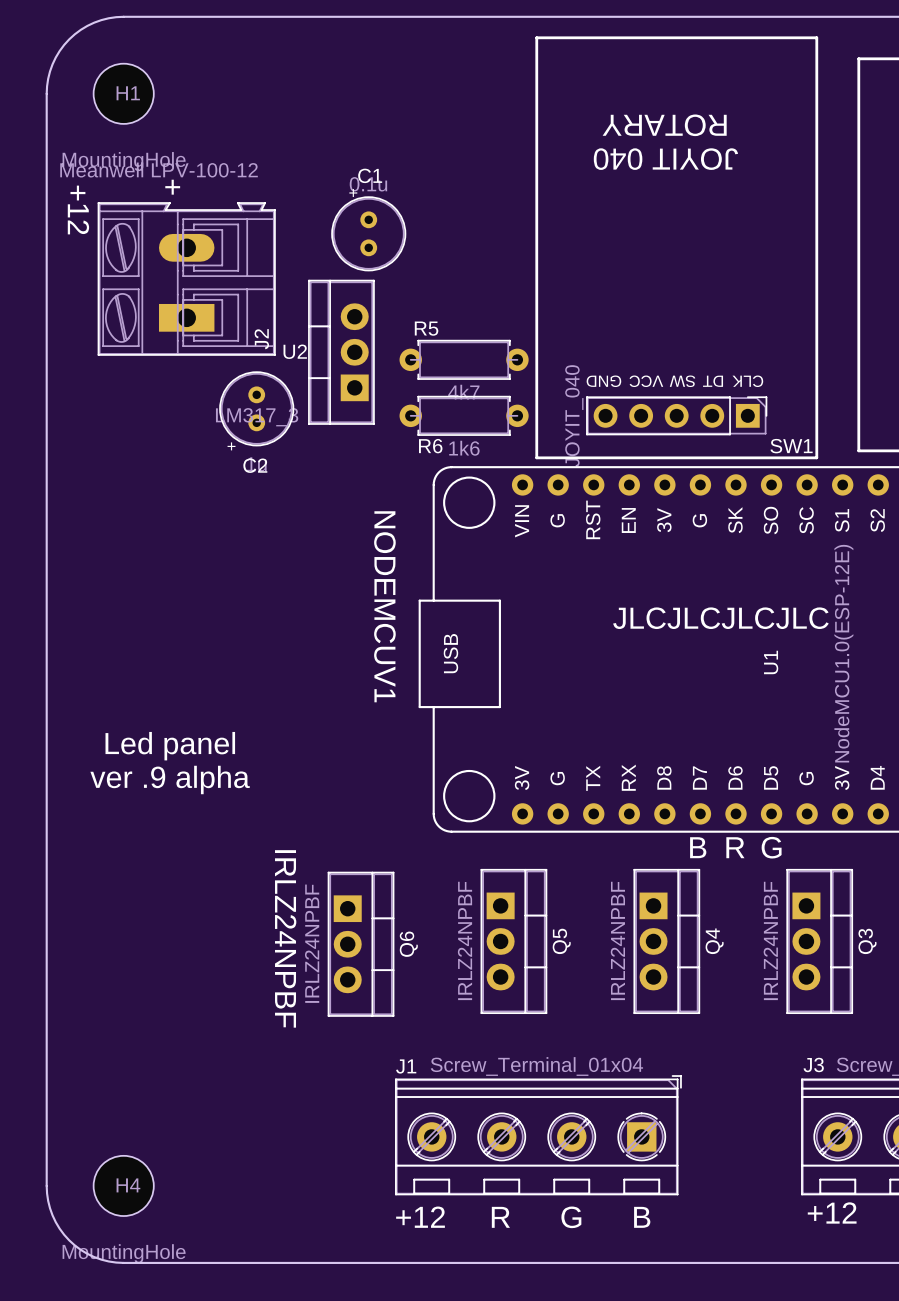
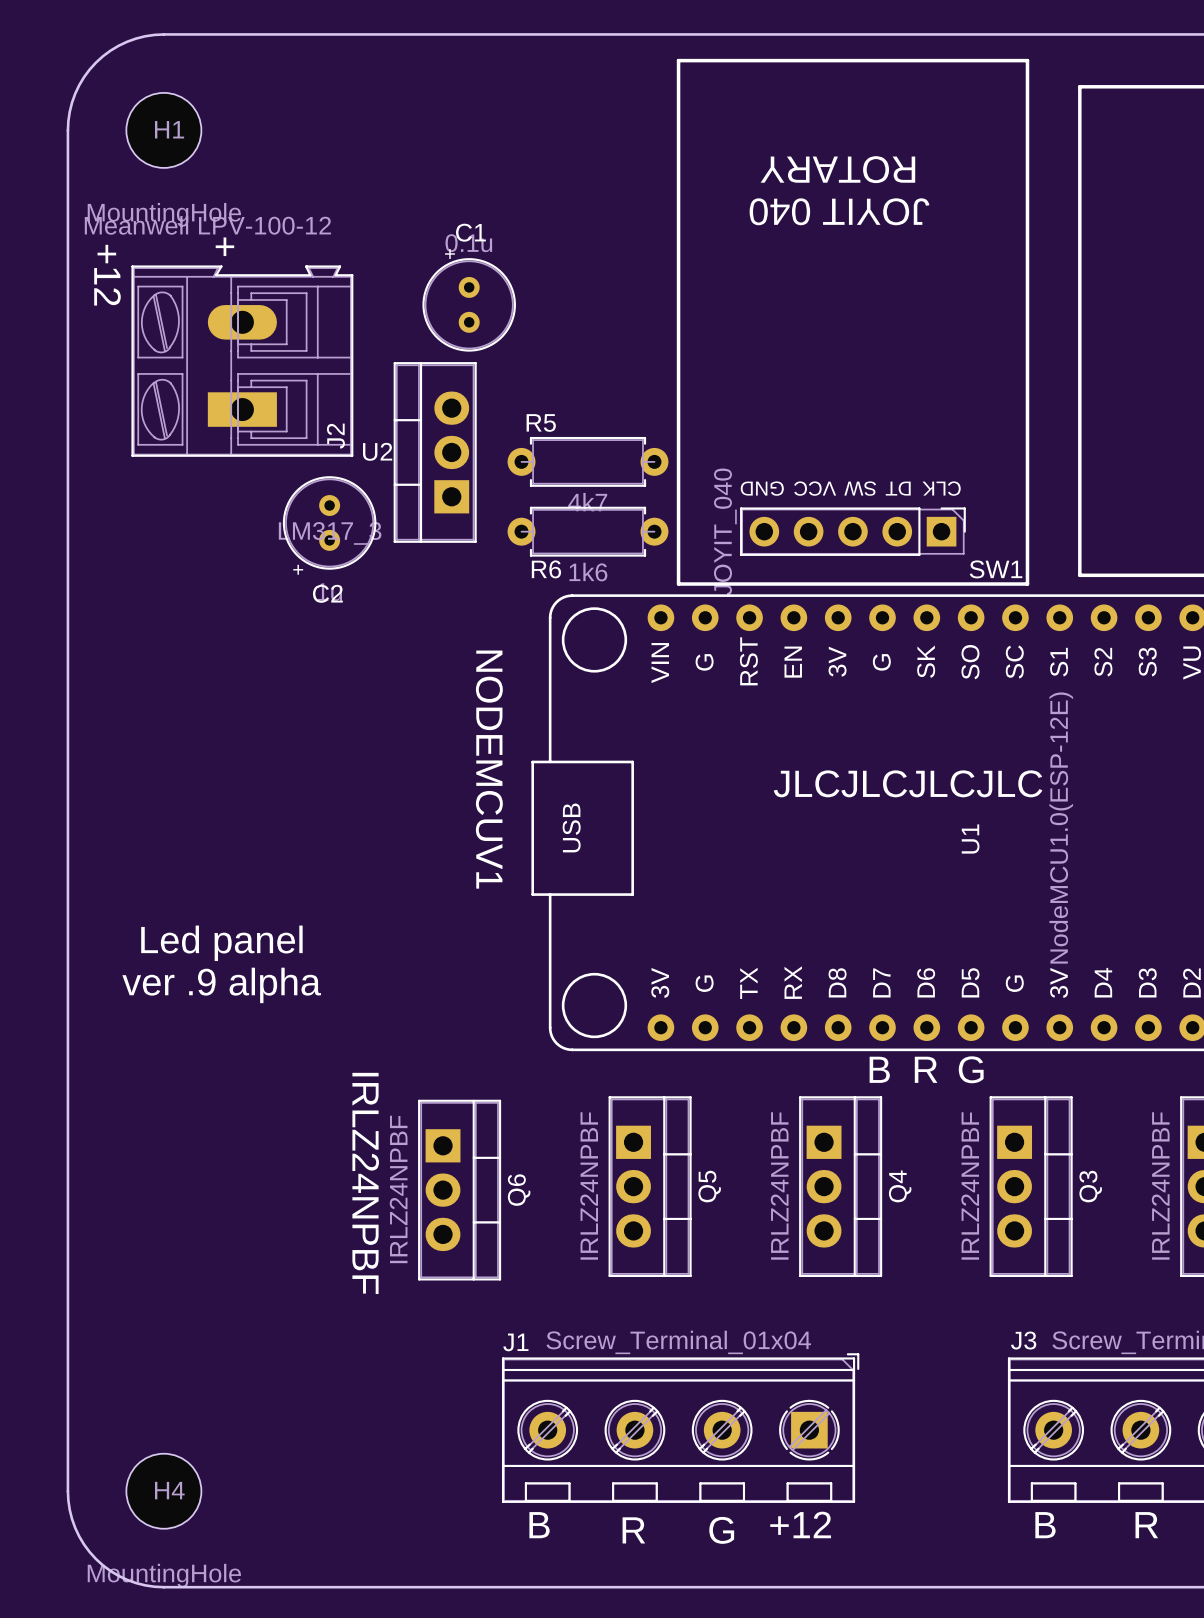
text: +12 (832, 1212) -> B (1045, 1525)
text position: +12 (420, 1217) -> +12 (800, 1524)
text position: B (642, 1217) -> B (539, 1525)

